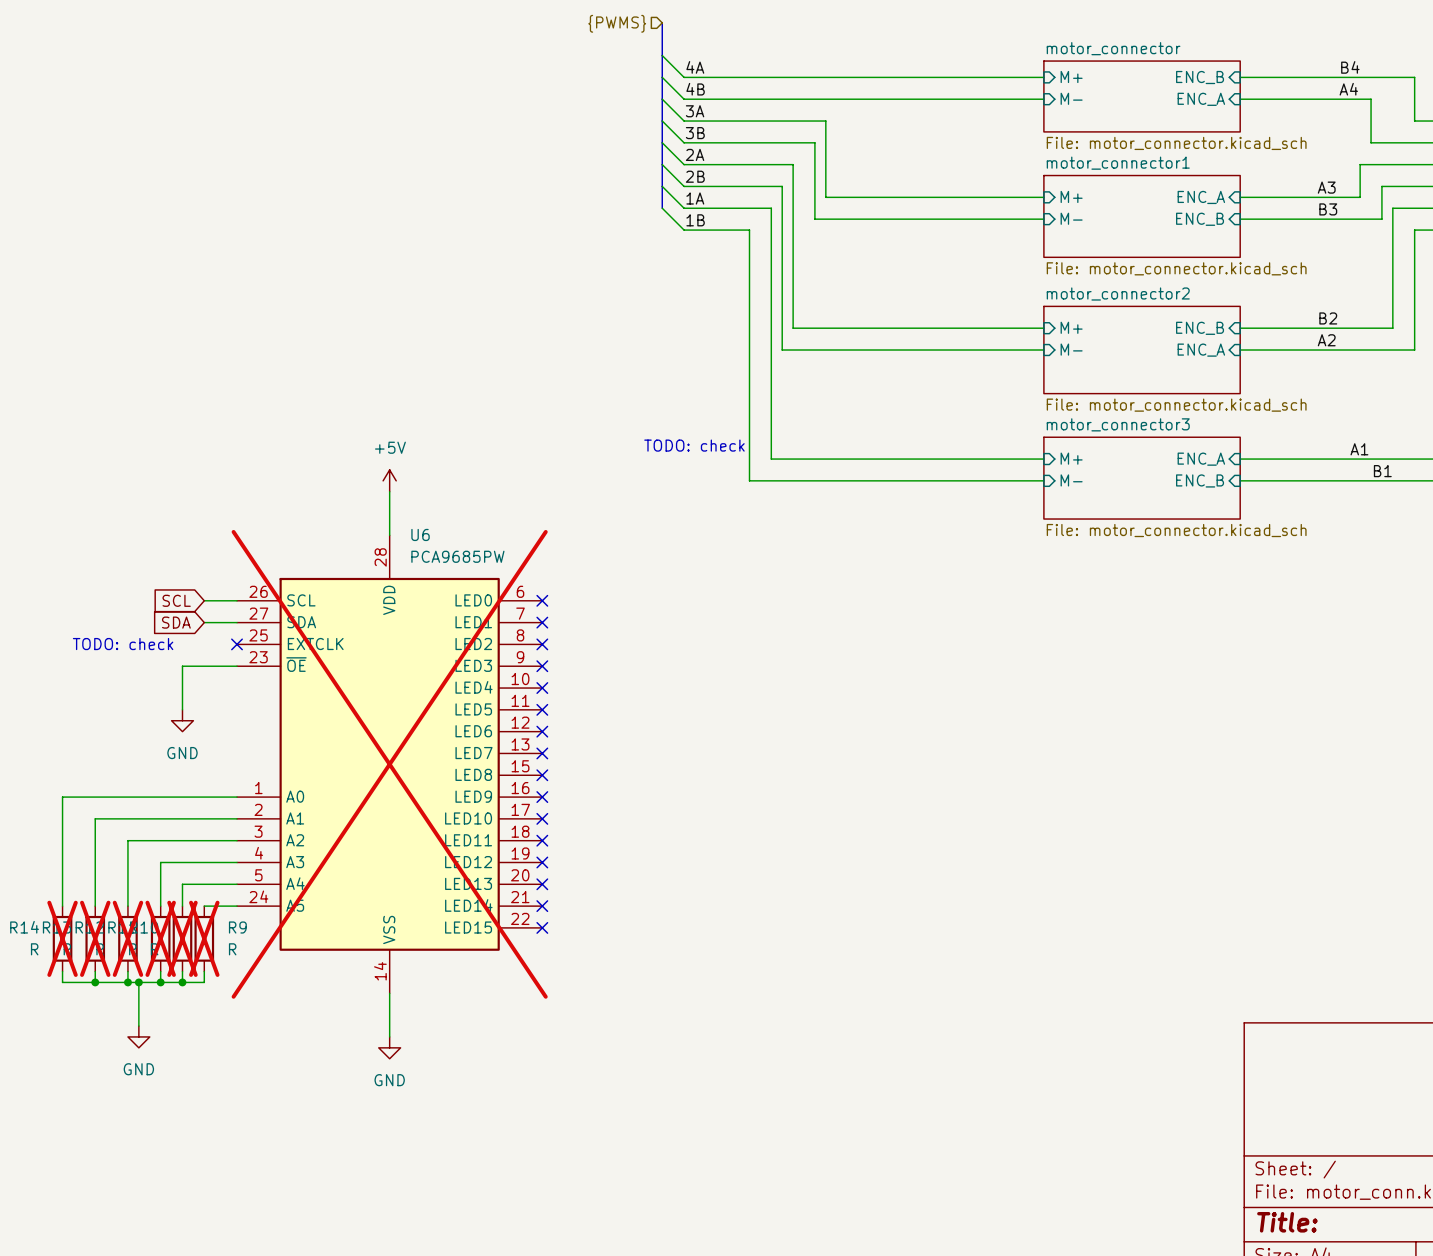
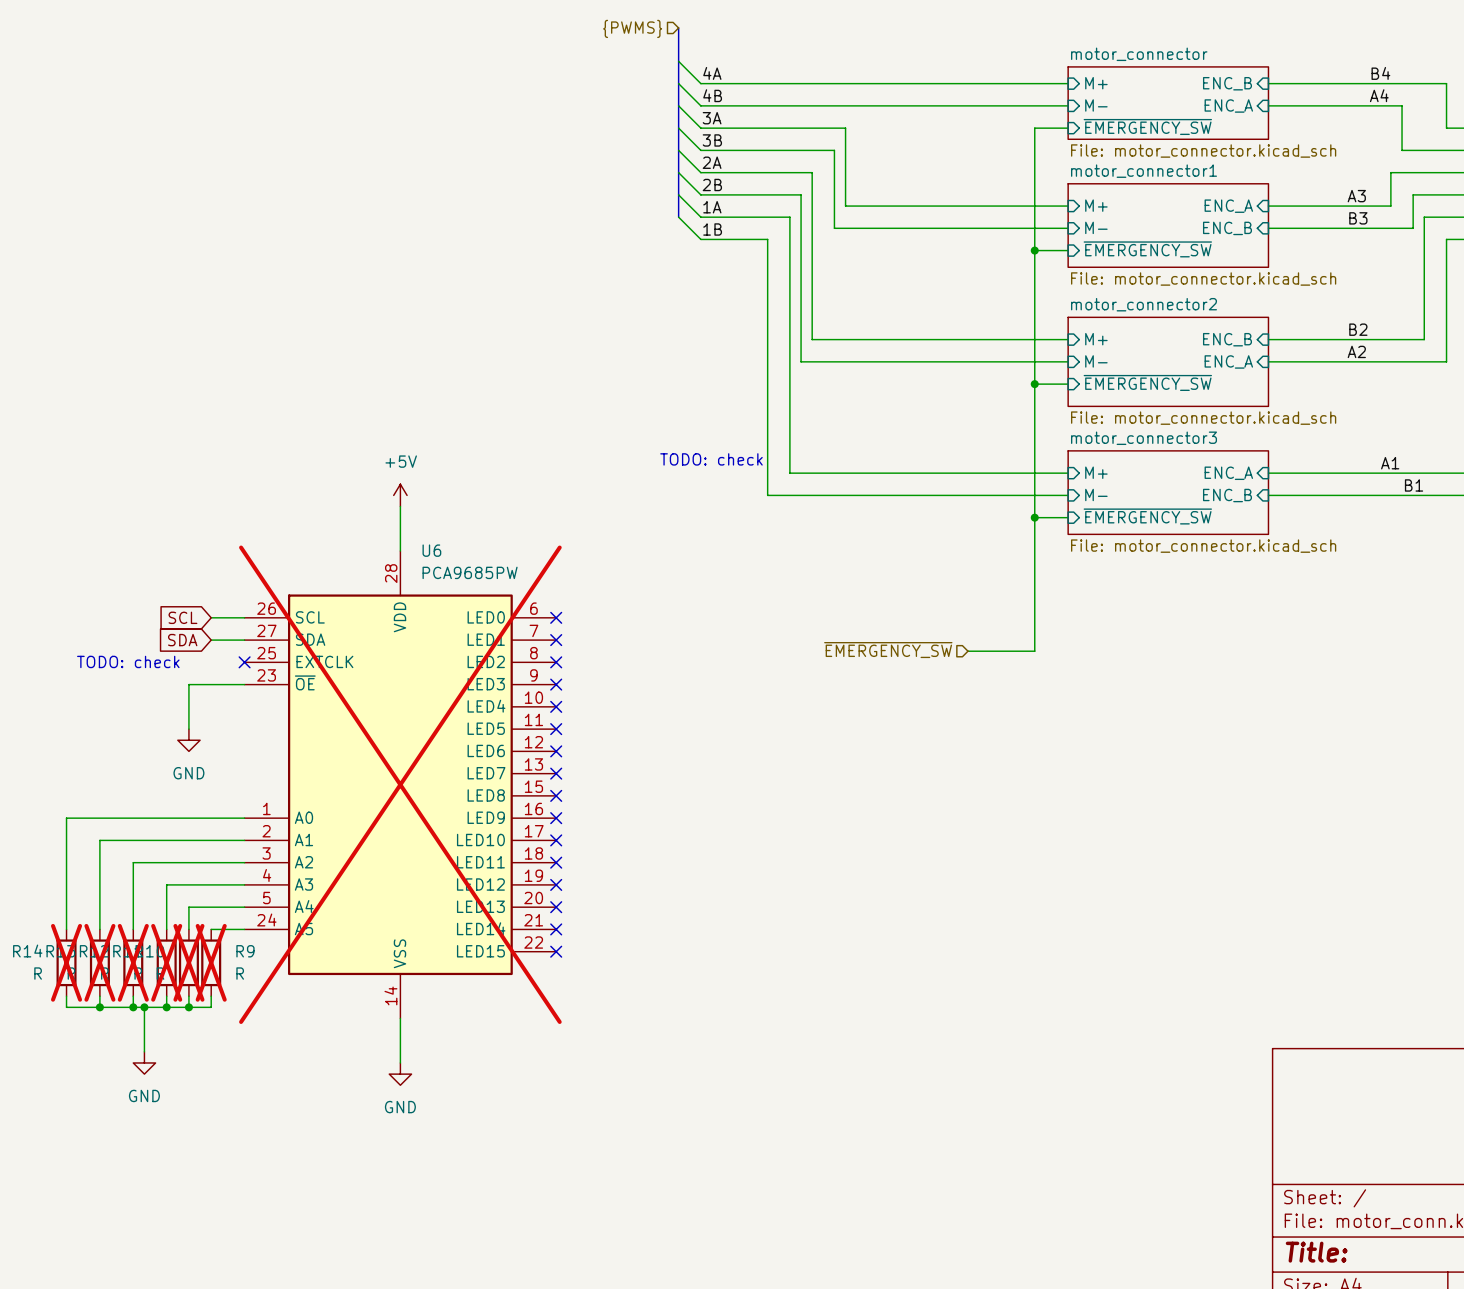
sheet pin: none -> ~{EMERGENCY_SW} (1147, 126)
wire: none -> (1068, 128) (1034, 128) (1034, 651) (967, 651)
sheet pin: none -> ~{EMERGENCY_SW} (1147, 249)
wire: none -> (1034, 250) (1068, 250)
junction: none -> (1034, 250)
sheet pin: none -> ~{EMERGENCY_SW} (1147, 382)
wire: none -> (1034, 384) (1068, 384)
junction: none -> (1034, 384)
sheet pin: none -> ~{EMERGENCY_SW} (1147, 516)
wire: none -> (1034, 517) (1068, 517)
junction: none -> (1034, 517)
hierarchical label: none -> ~{EMERGENCY_SW} (888, 650)

